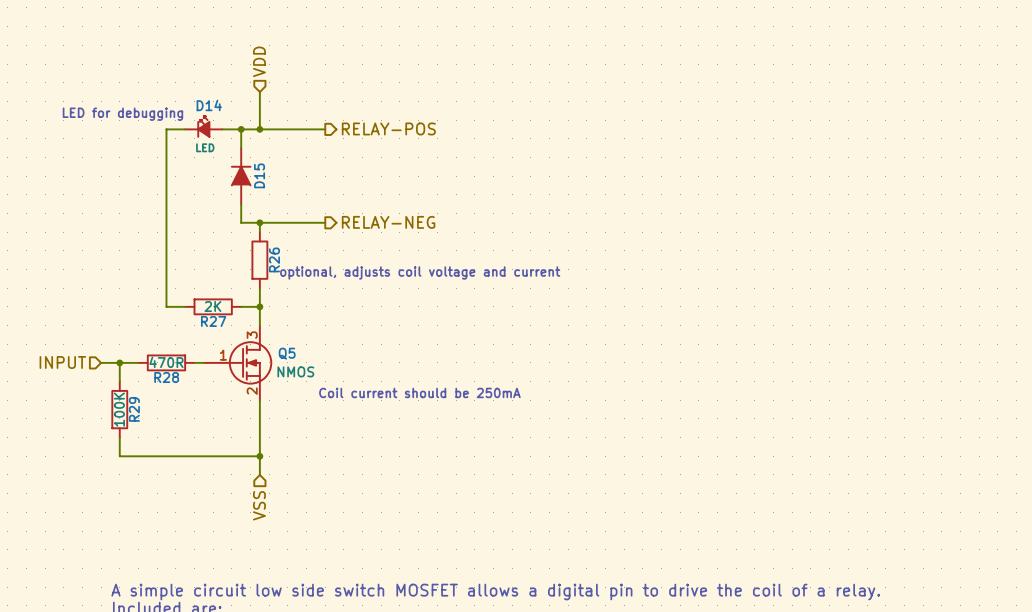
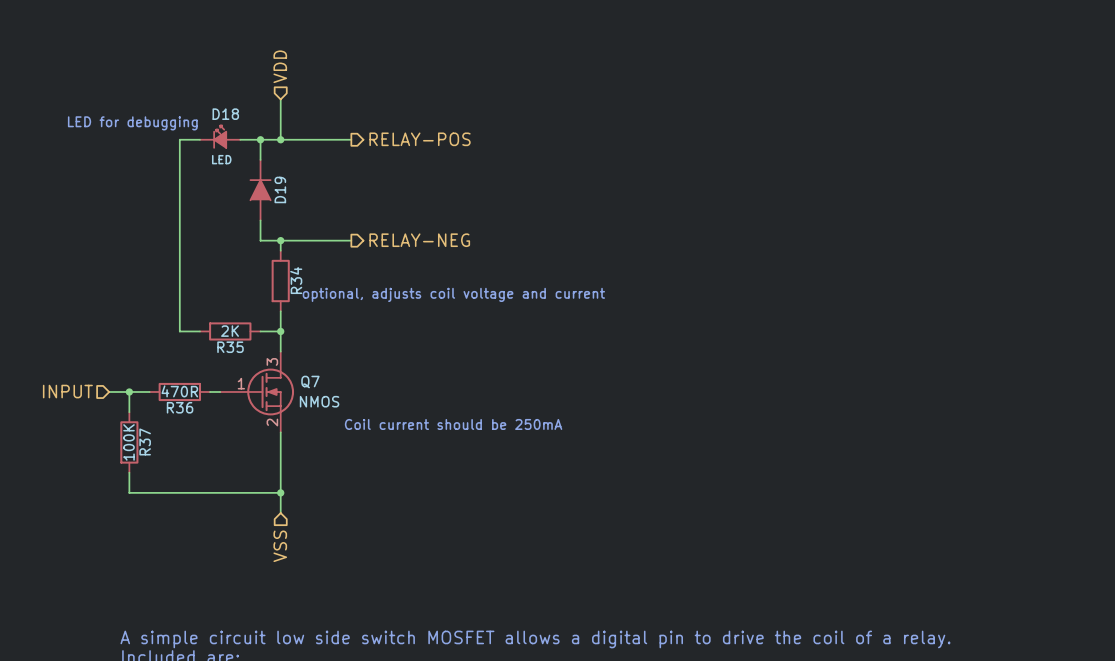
D14 name: D14 (209, 105) -> D18 (225, 114)
D15 name: D15 (259, 175) -> D19 (280, 189)
R26 name: R26 (274, 259) -> R34 (296, 280)
R27 name: R27 (213, 321) -> R35 (230, 347)
Q5 name: Q5 (287, 353) -> Q7 (310, 382)
R28 name: R28 (166, 377) -> R36 (180, 407)
R29 name: R29 (134, 409) -> R37 (145, 441)

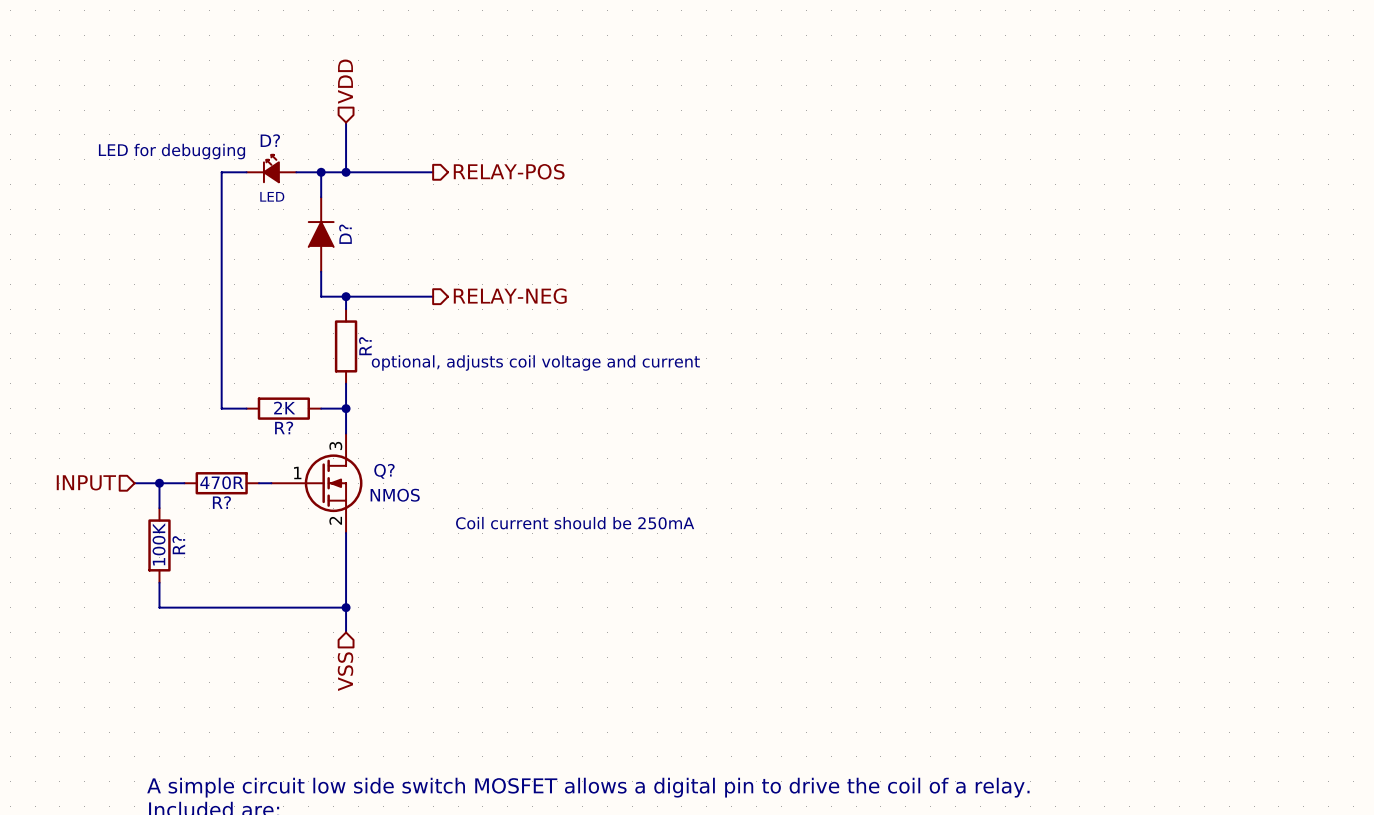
D18 name: D18 (225, 114) -> D? (270, 140)
D19 name: D19 (280, 189) -> D? (345, 234)
R34 name: R34 (296, 280) -> R? (365, 346)
R35 name: R35 (230, 347) -> R? (284, 427)
Q7 name: Q7 (310, 382) -> Q? (384, 471)
R36 name: R36 (180, 407) -> R? (221, 502)
R37 name: R37 (145, 441) -> R? (178, 545)

